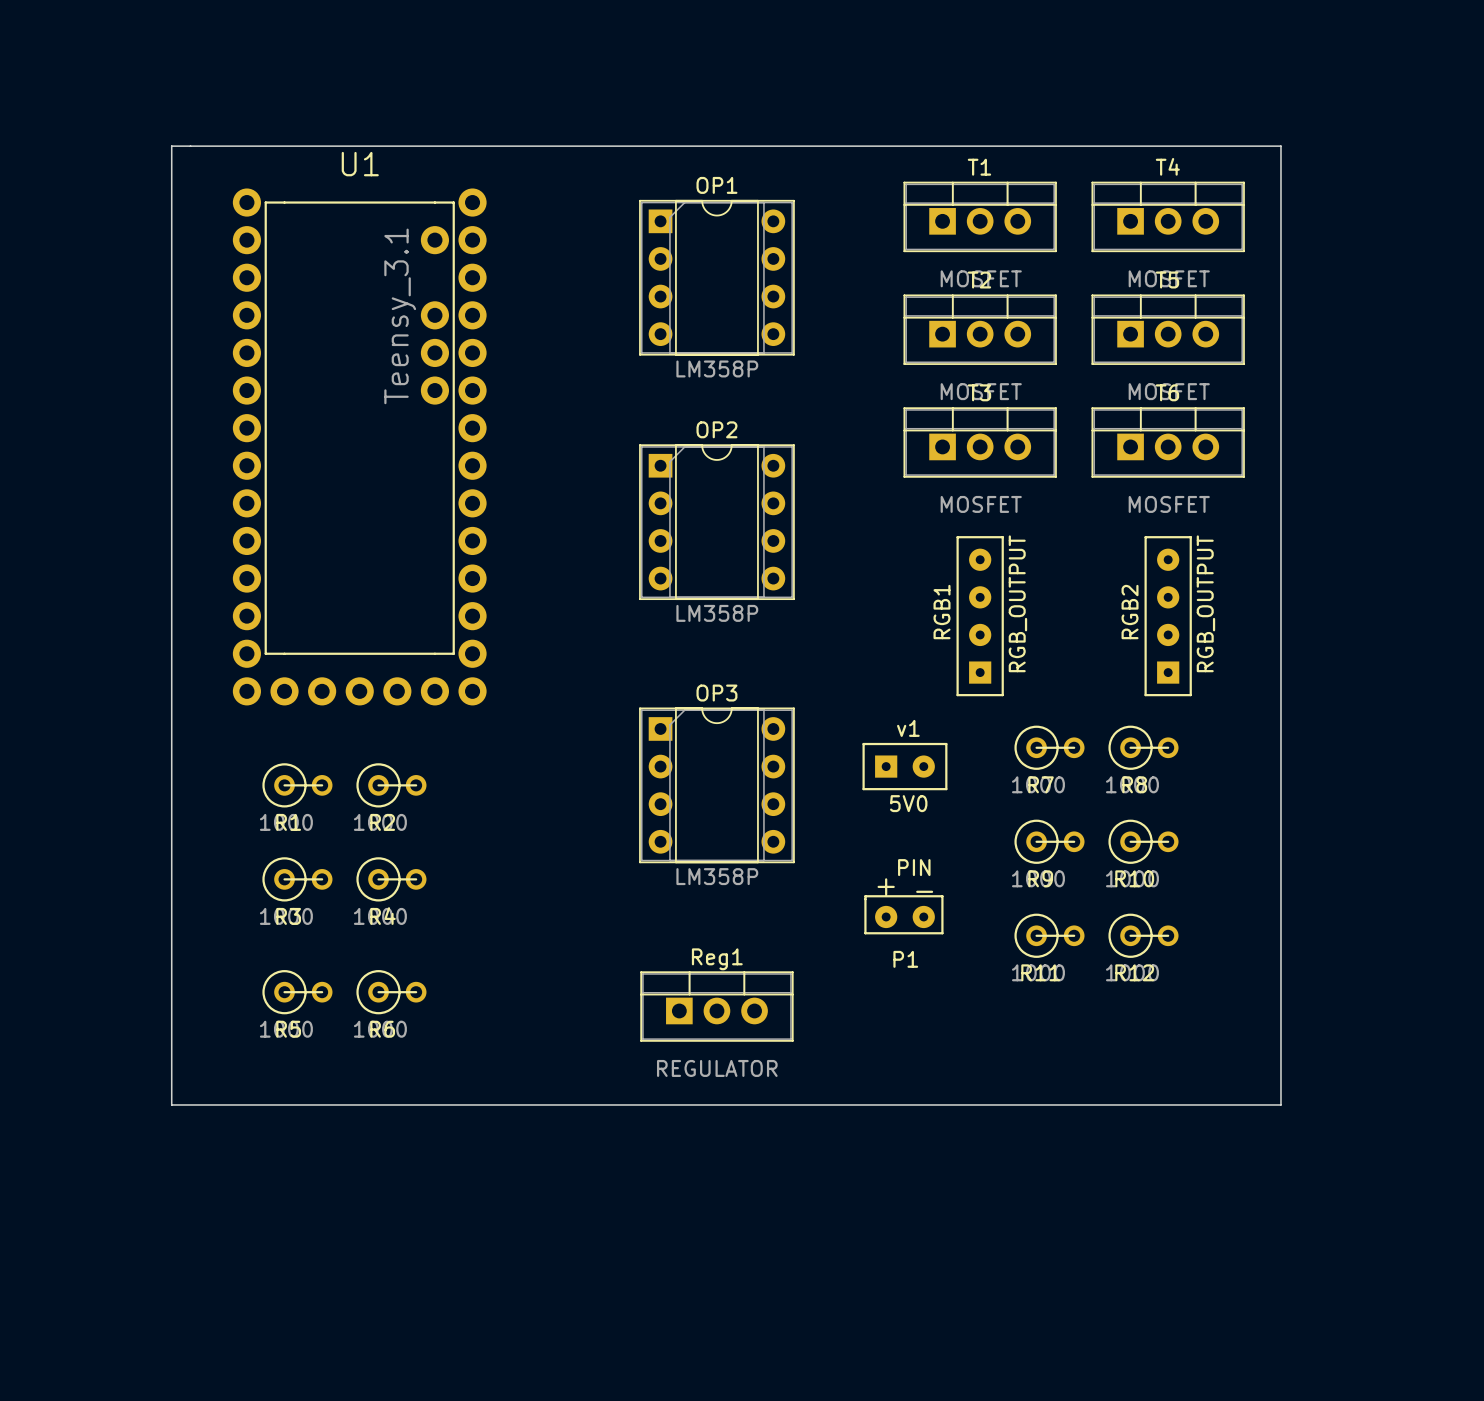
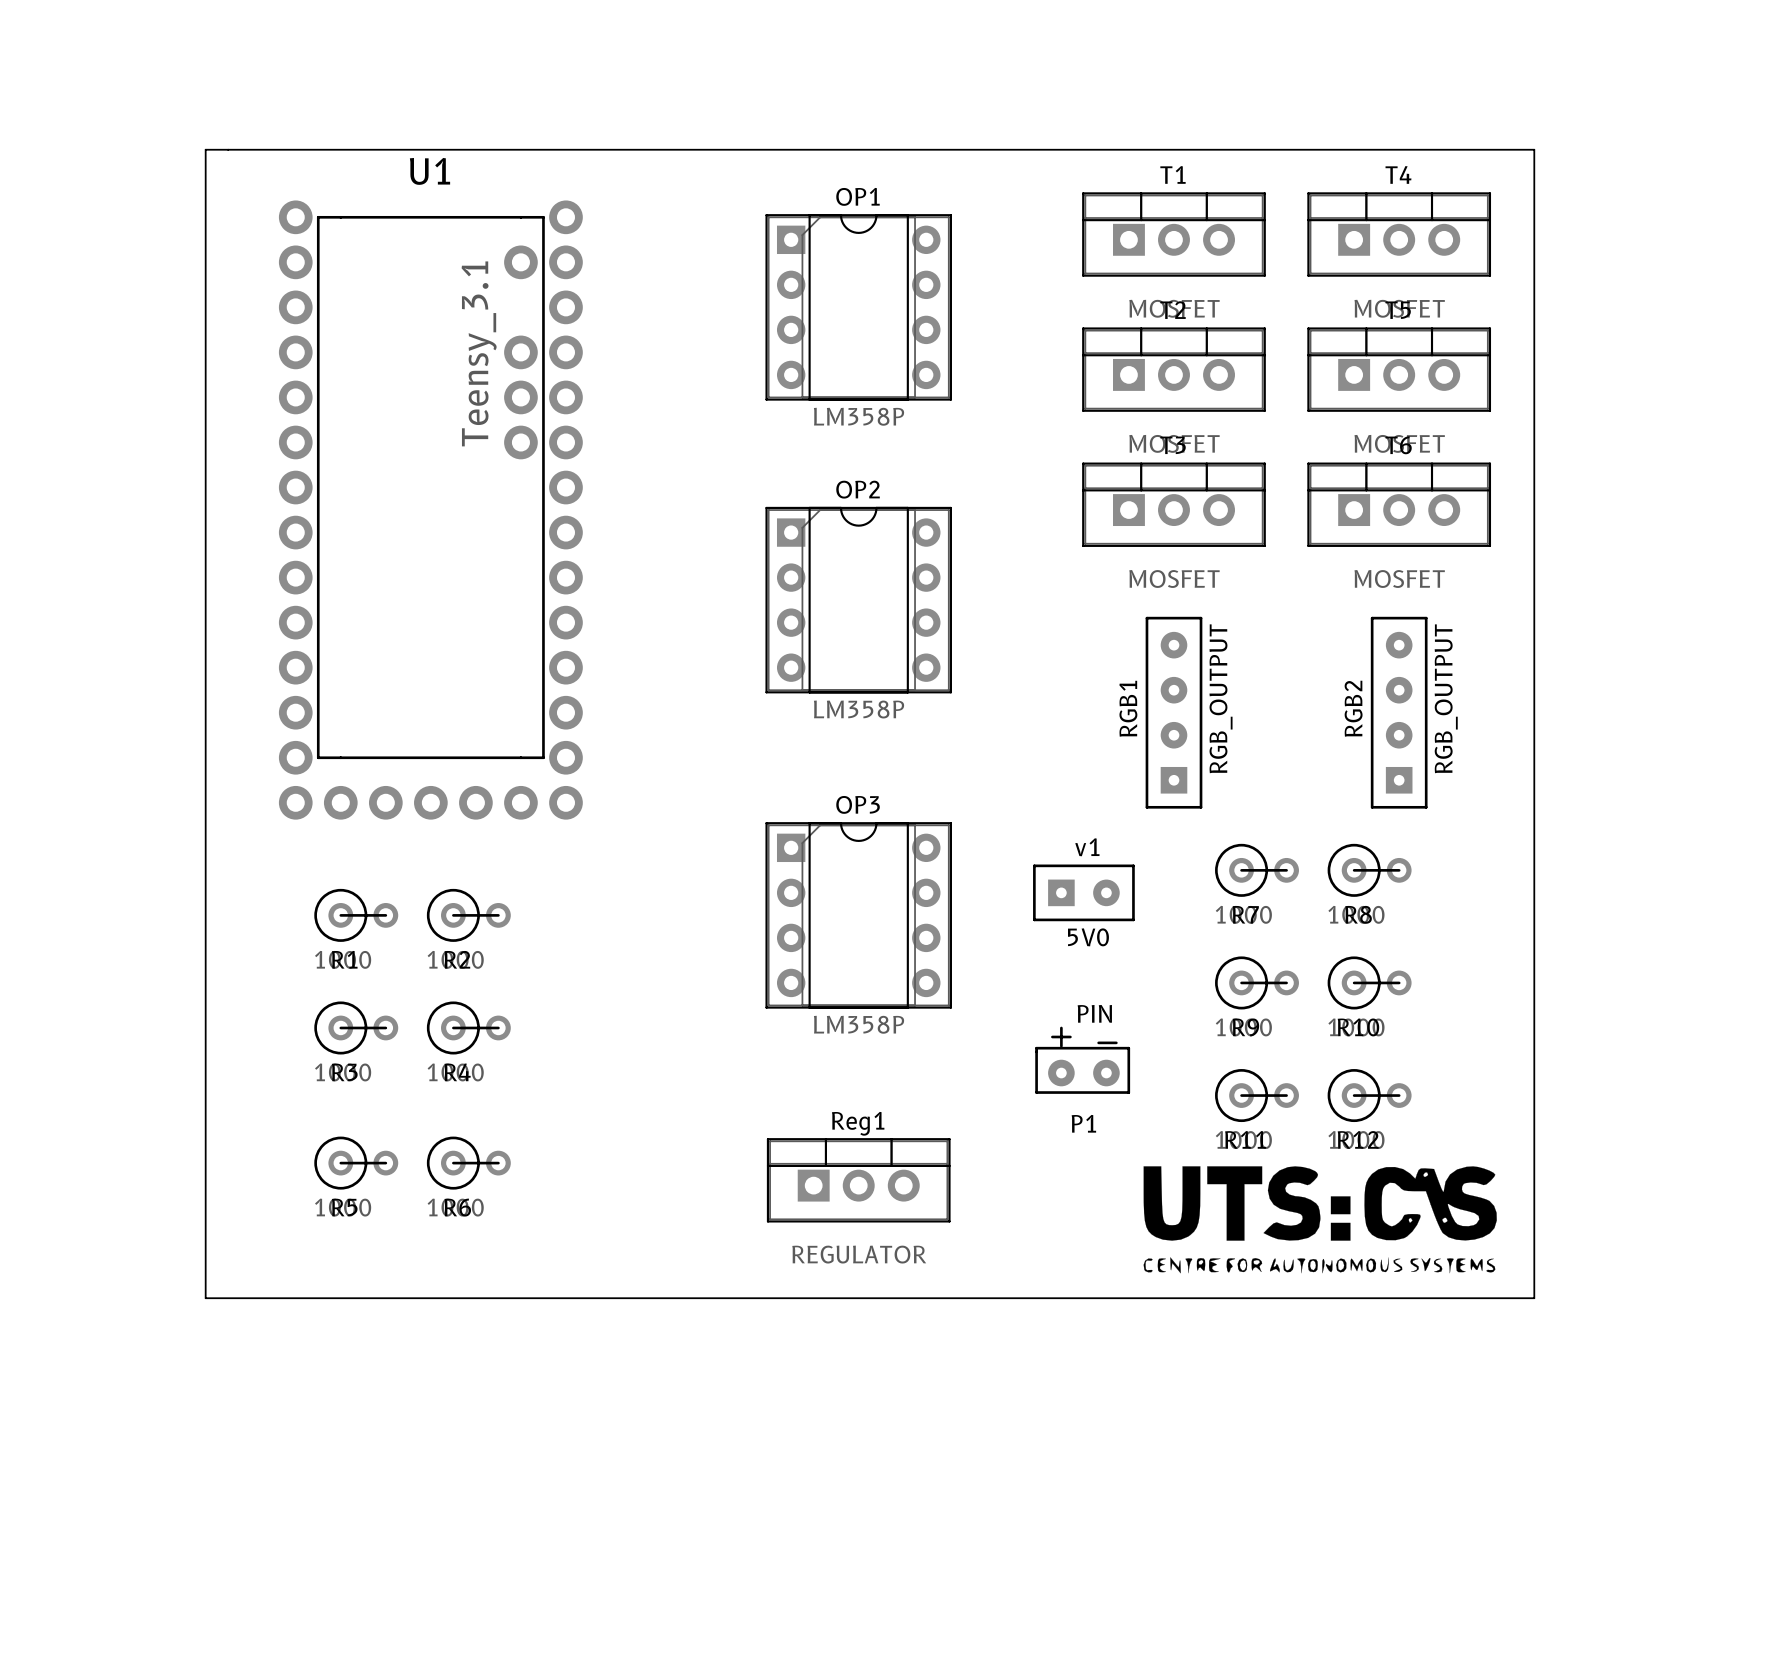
drawing: none -> [1143, 1166, 1497, 1274]

